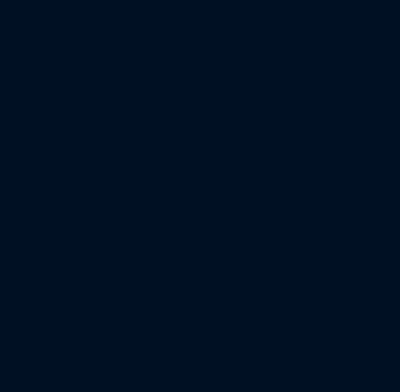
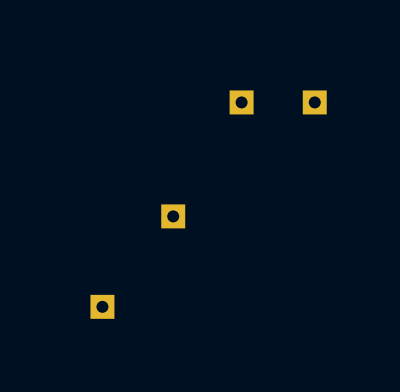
part: none -> (241, 102)
part: none -> (314, 102)
part: none -> (173, 216)
part: none -> (102, 306)

